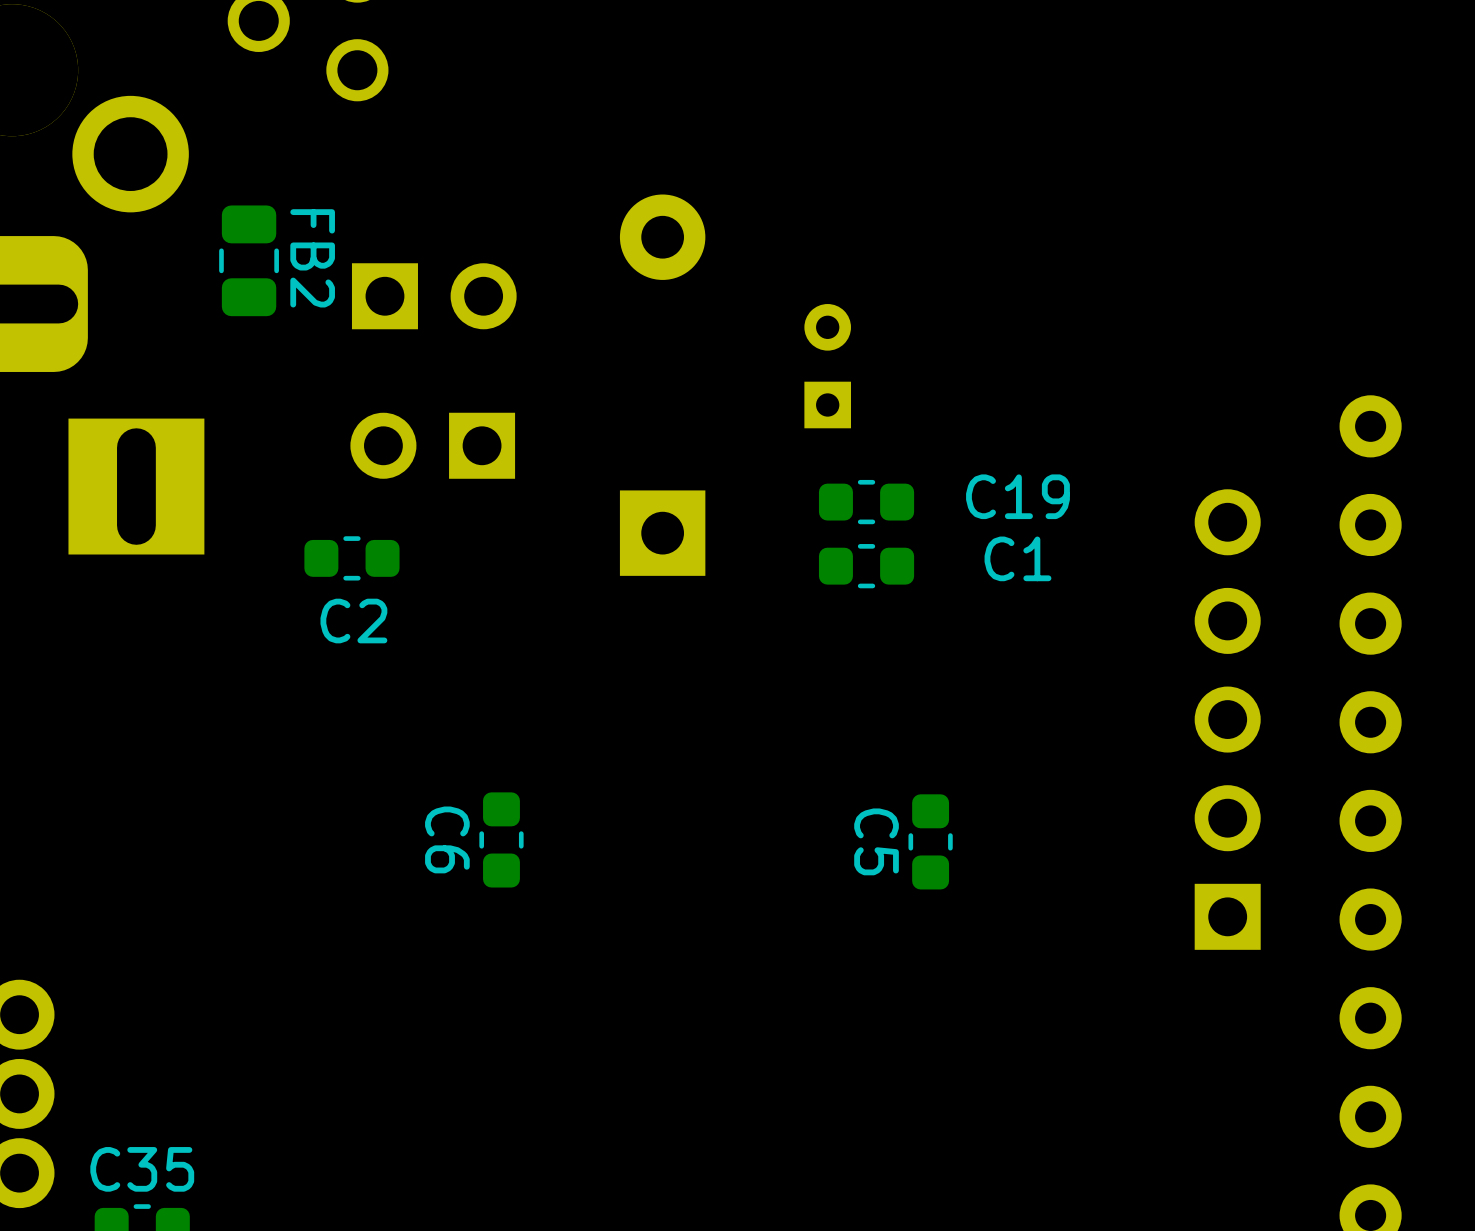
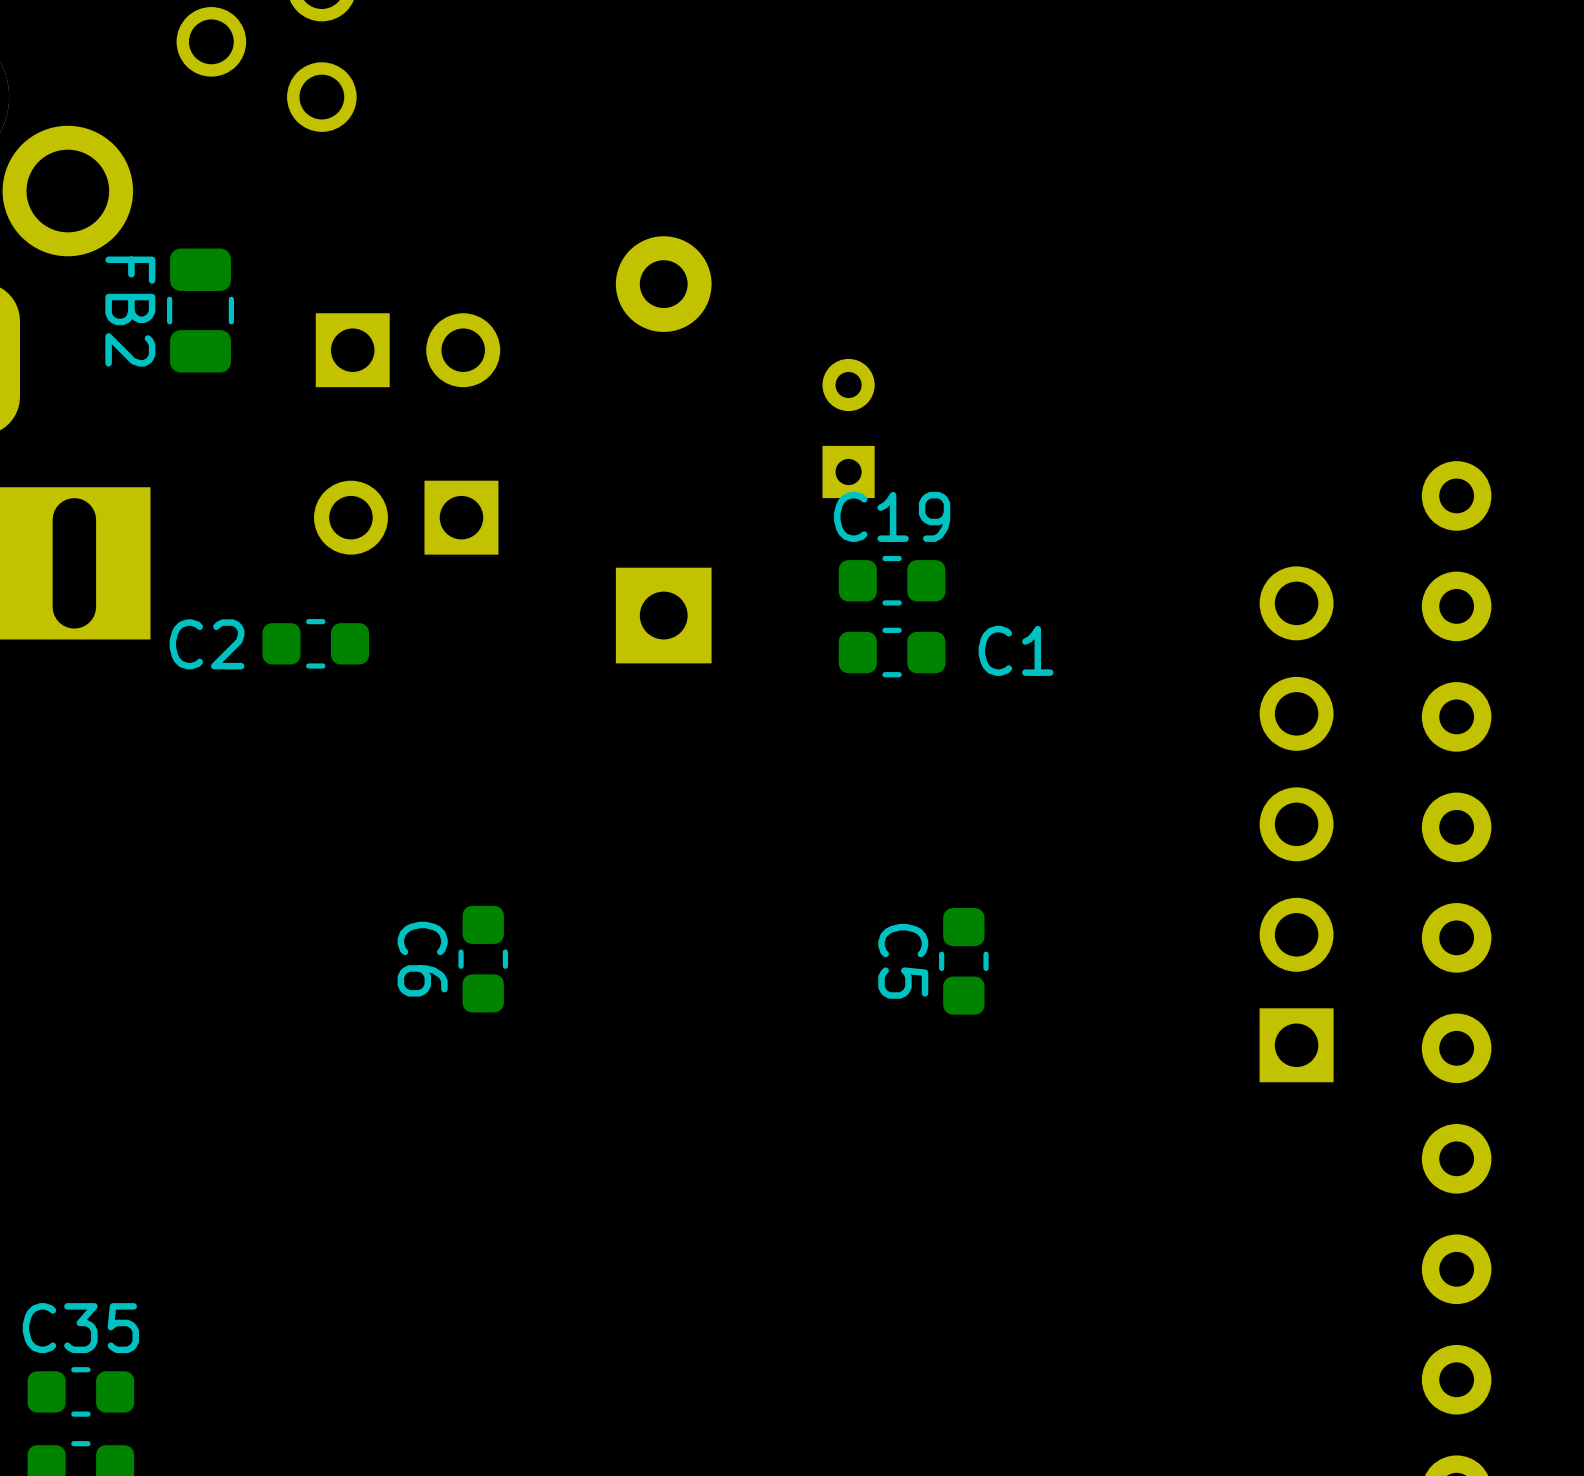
FB2 name position: FB2 (312, 258) -> FB2 (130, 311)
C19 name position: C19 (1017, 496) -> C19 (892, 516)
C1 name position: C1 (1017, 558) -> C1 (1016, 650)
C2 name position: C2 (353, 621) -> C2 (207, 644)

